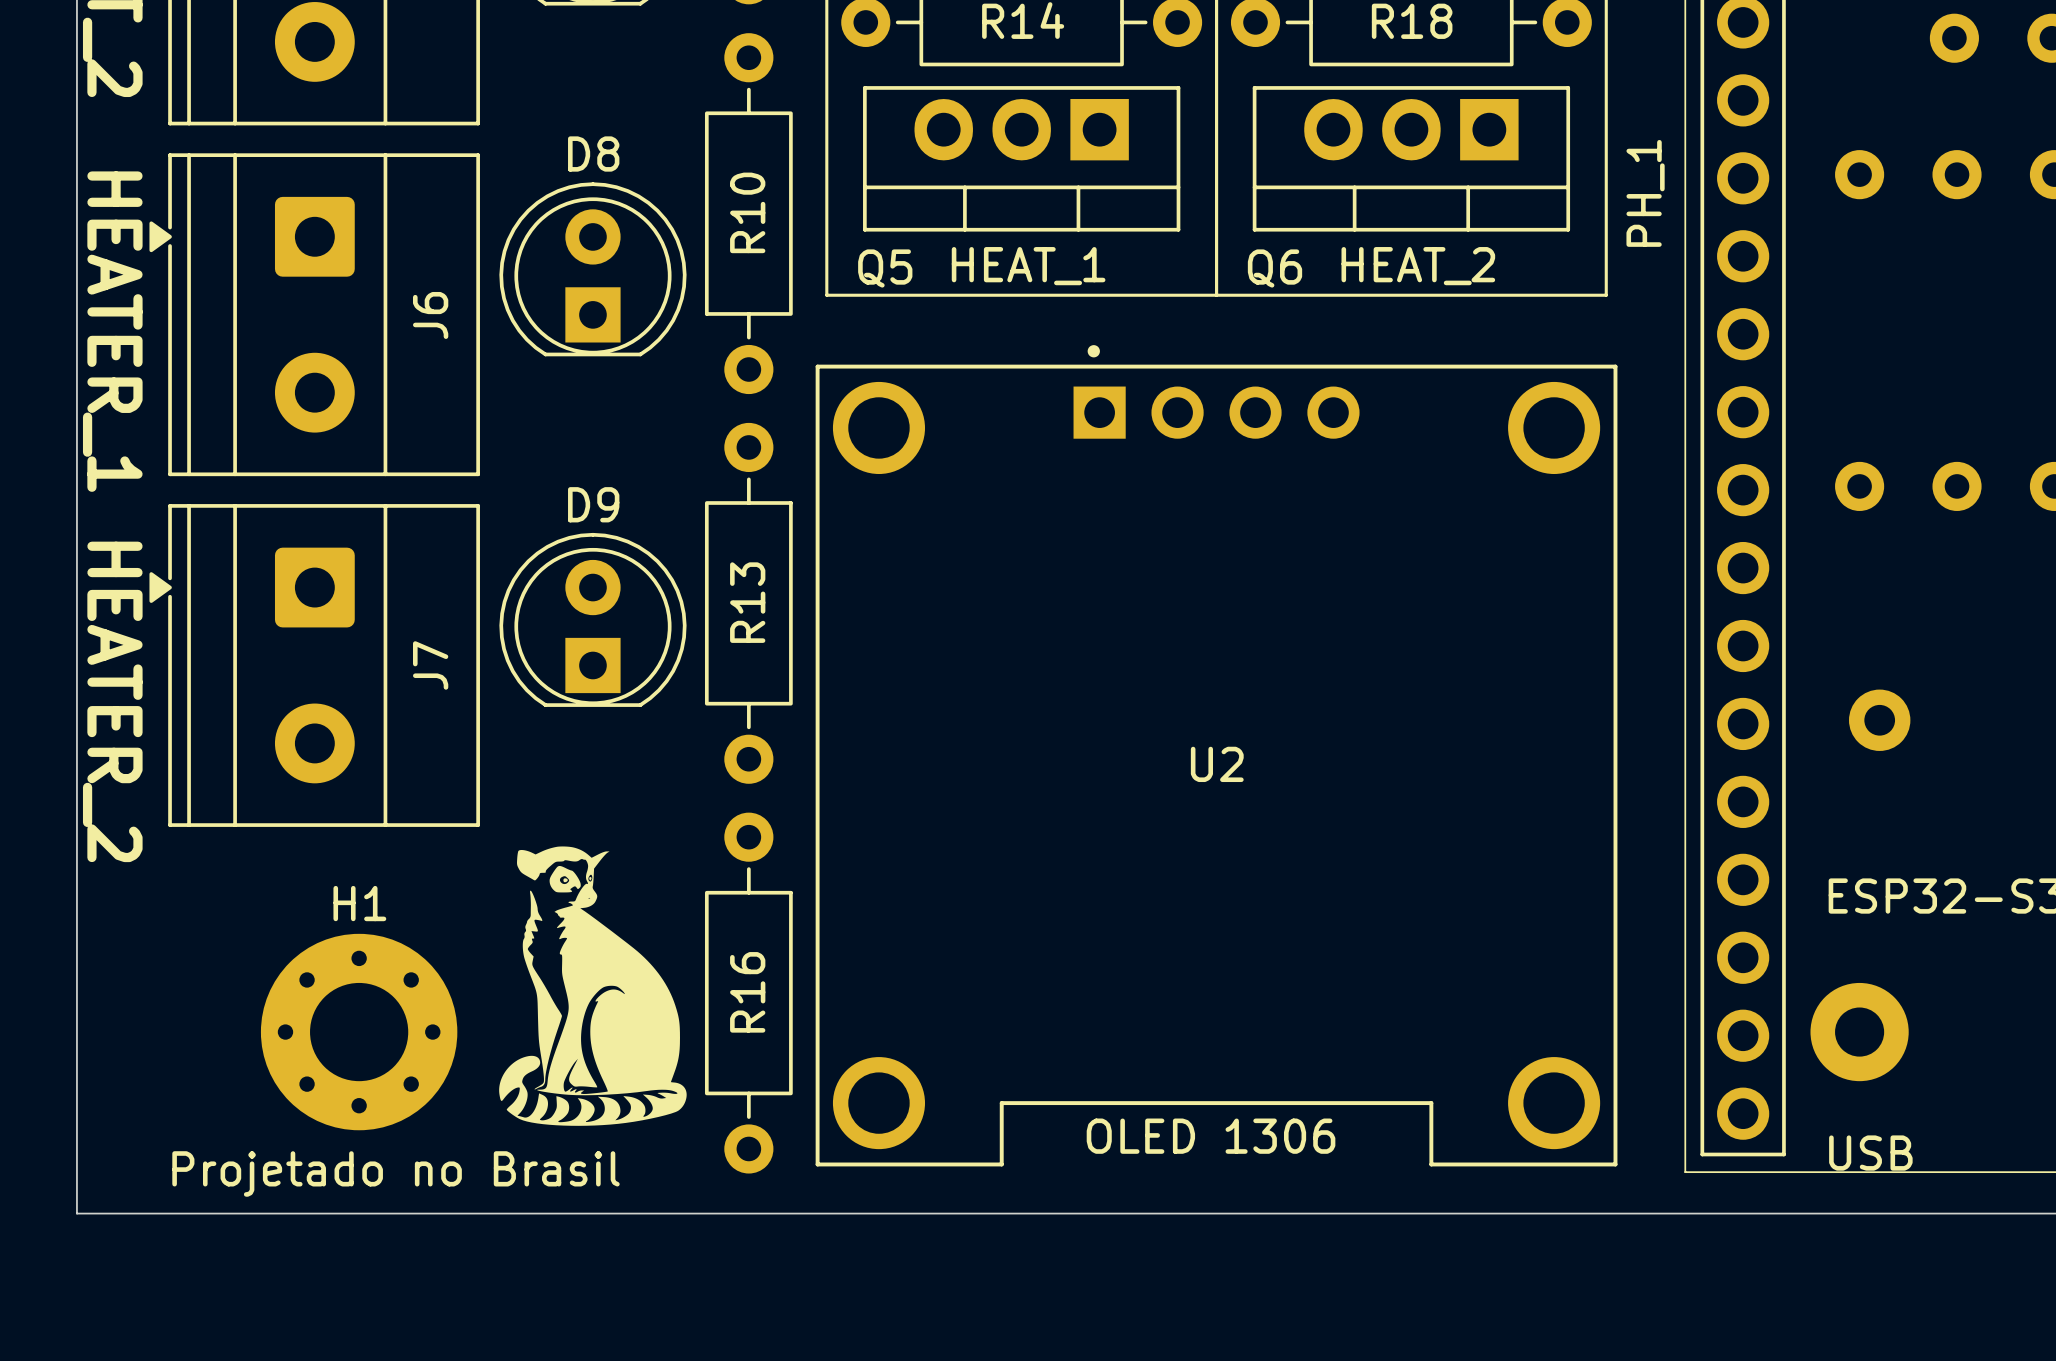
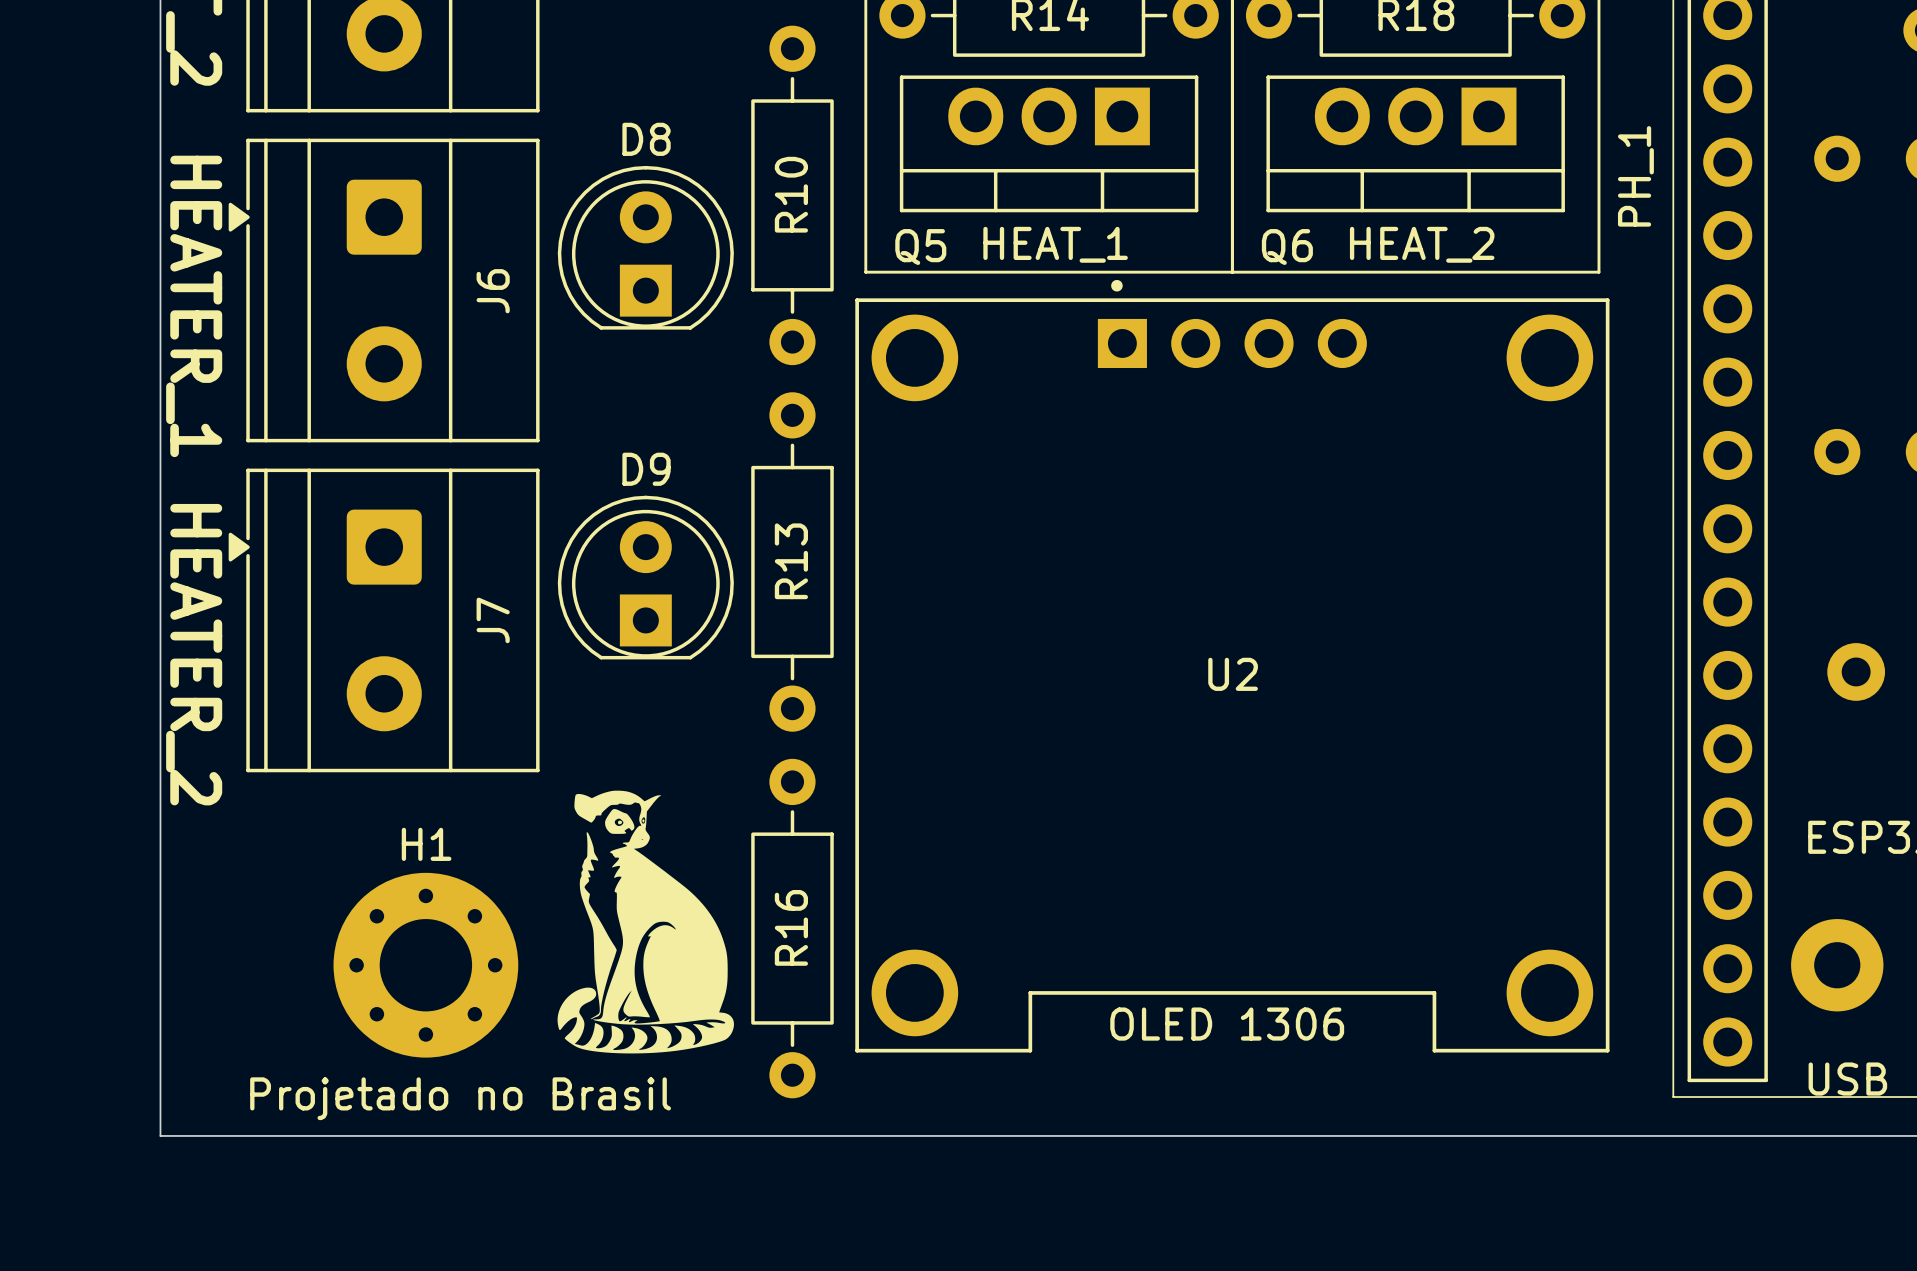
U2 position: (1216, 755) -> (1232, 666)
text position: OLED 1306 (1211, 1136) -> OLED 1306 (1227, 1024)

